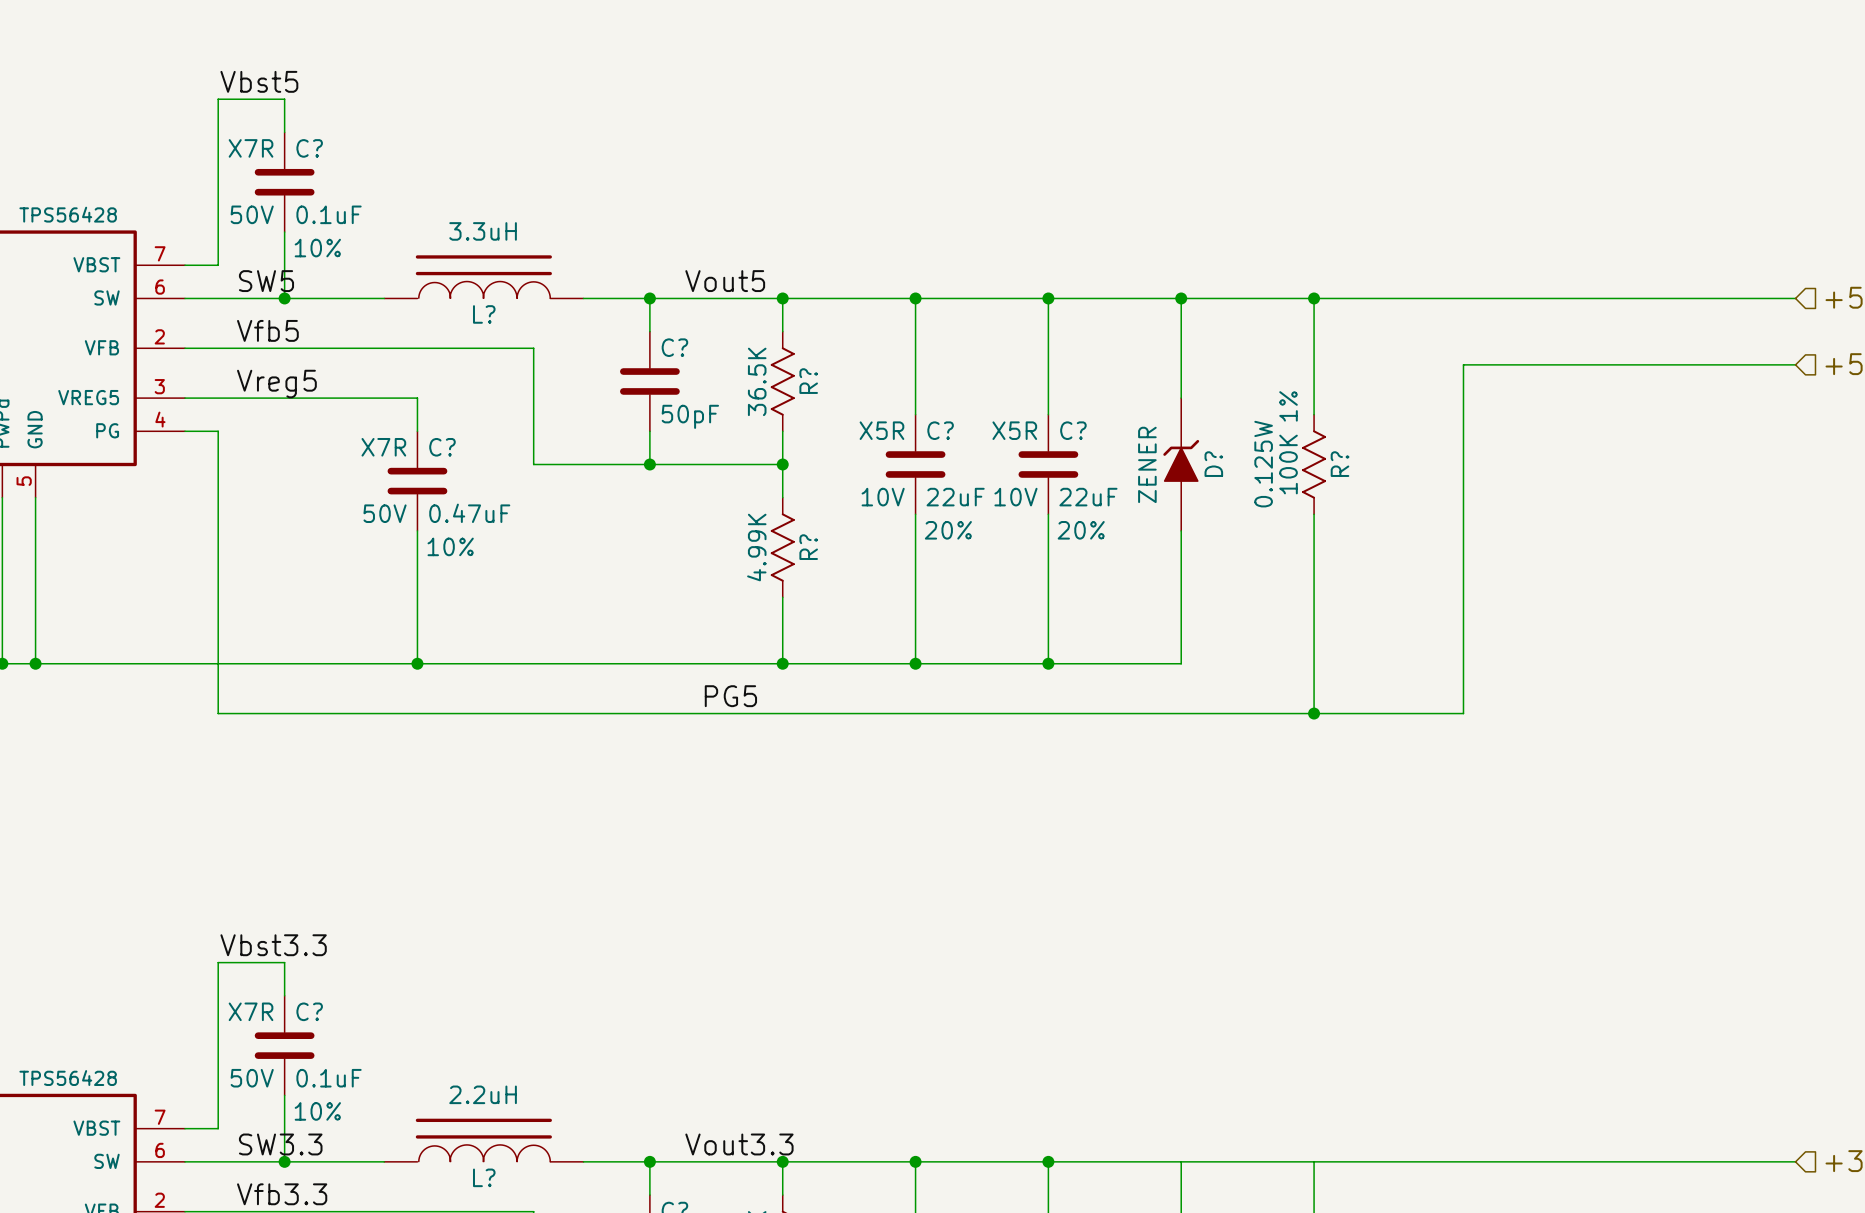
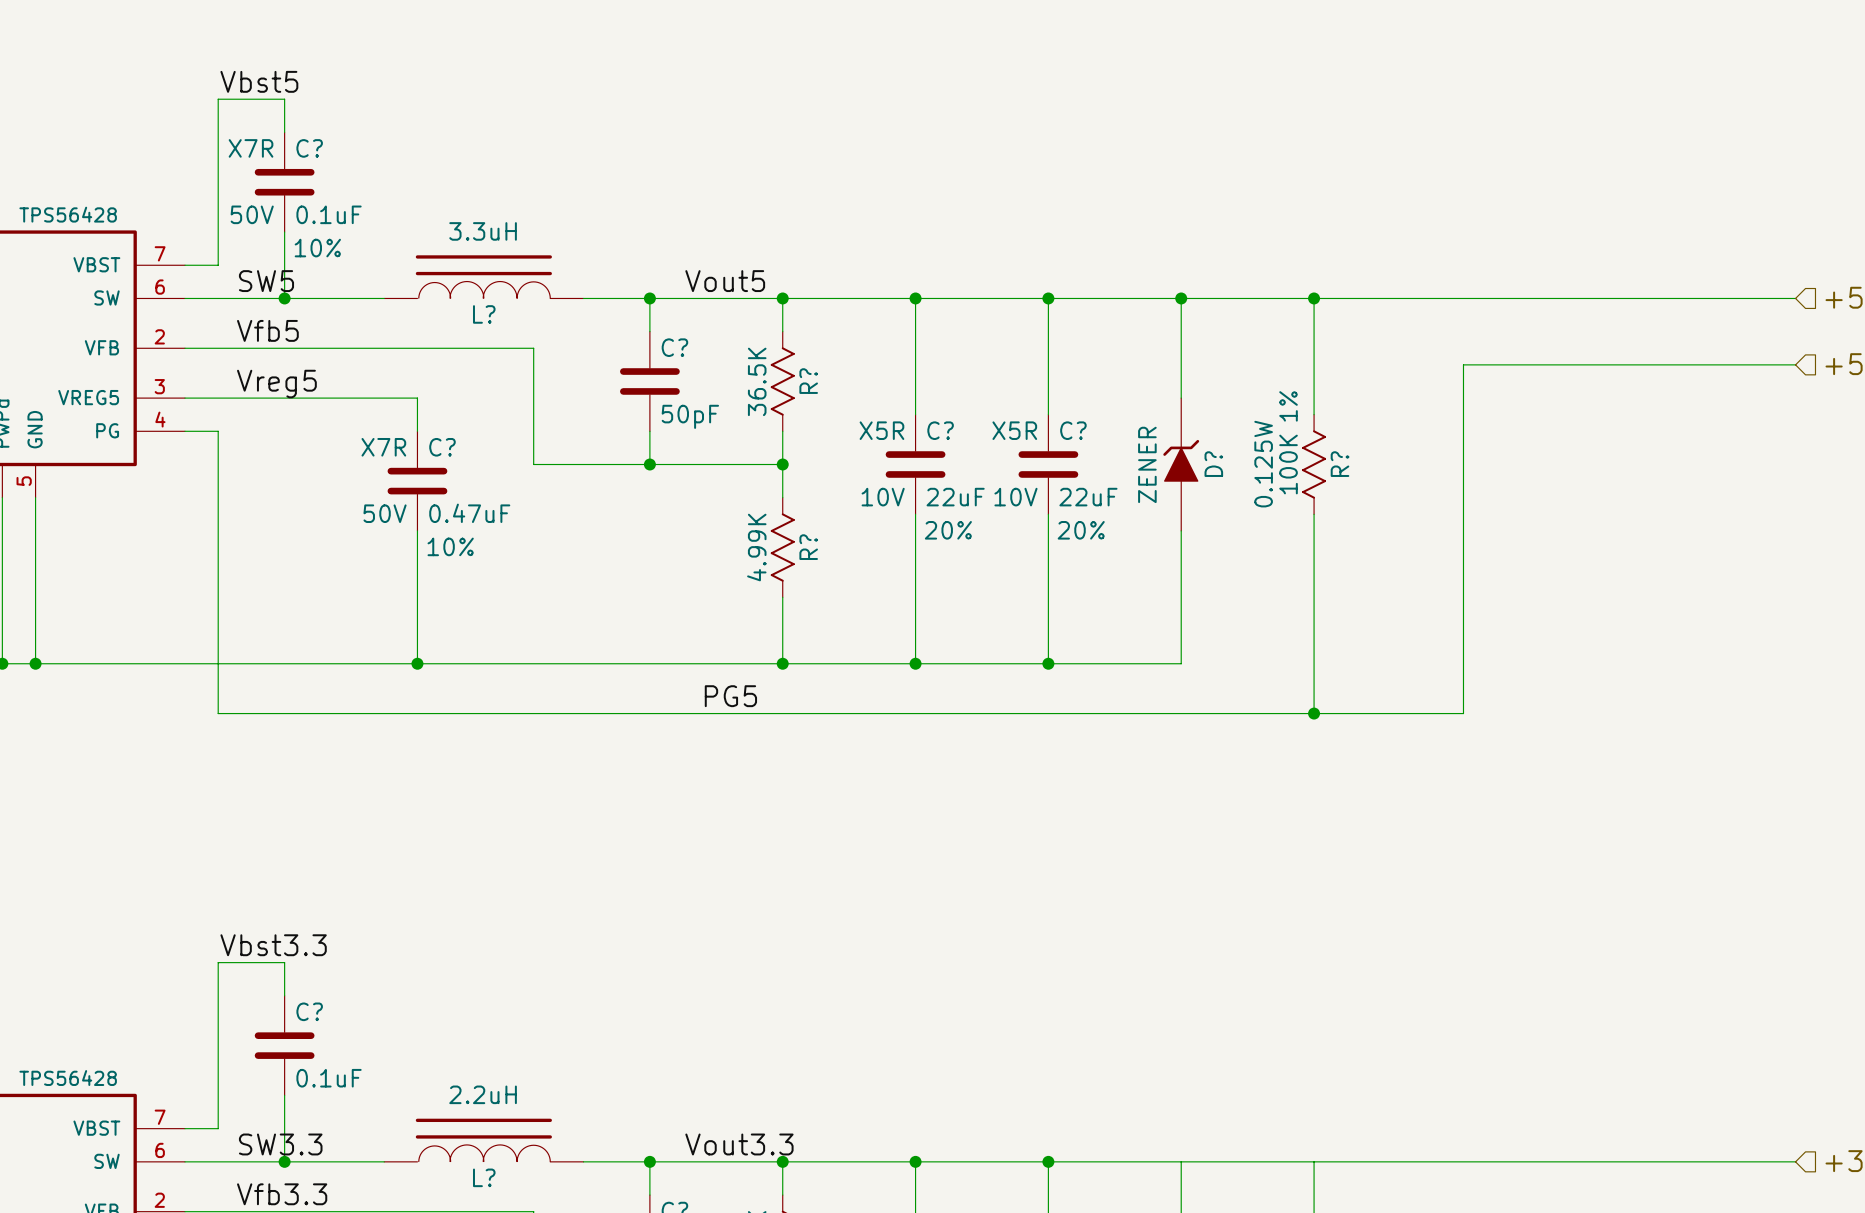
C? text: X7R (251, 1011) -> none
C? text: 50V (252, 1078) -> none
C? text: 10% (317, 1111) -> none

